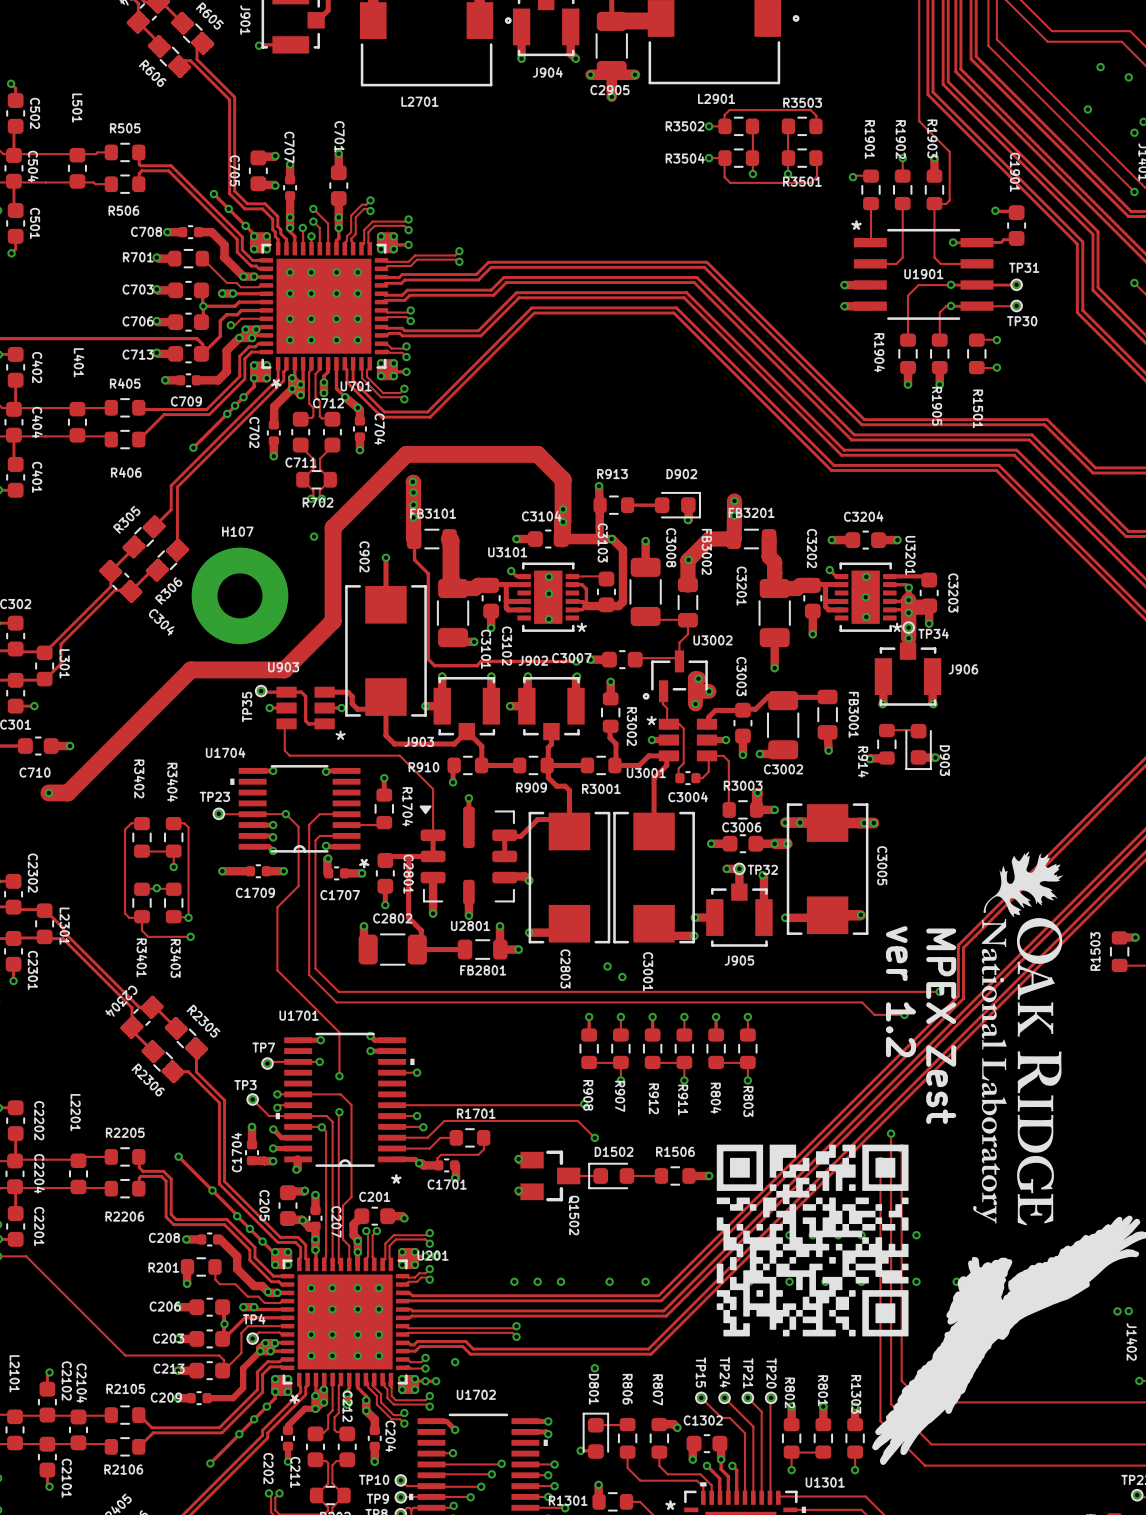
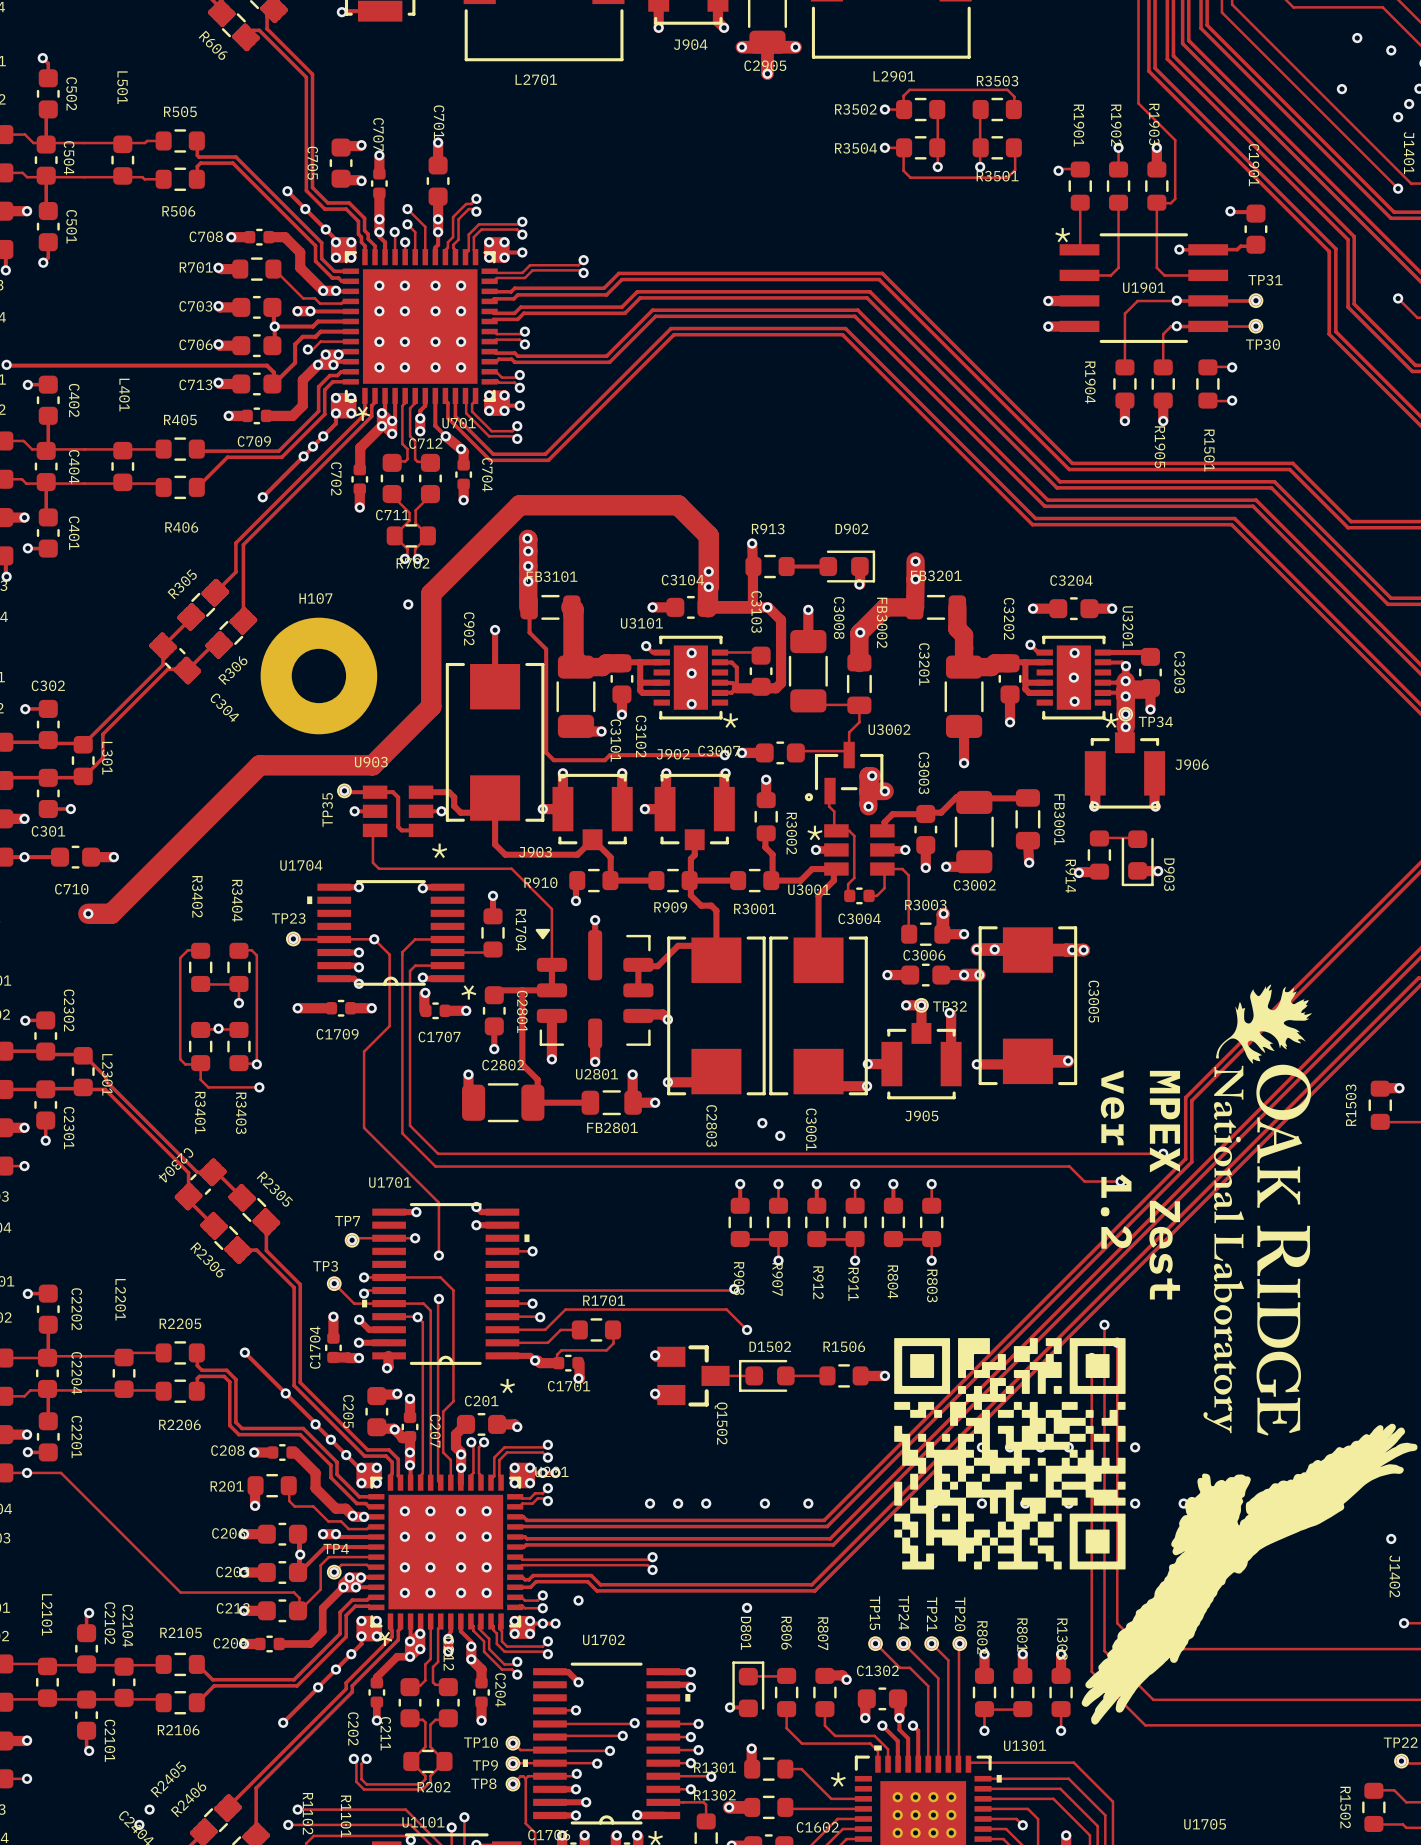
via: (1117, 1311) -> none

